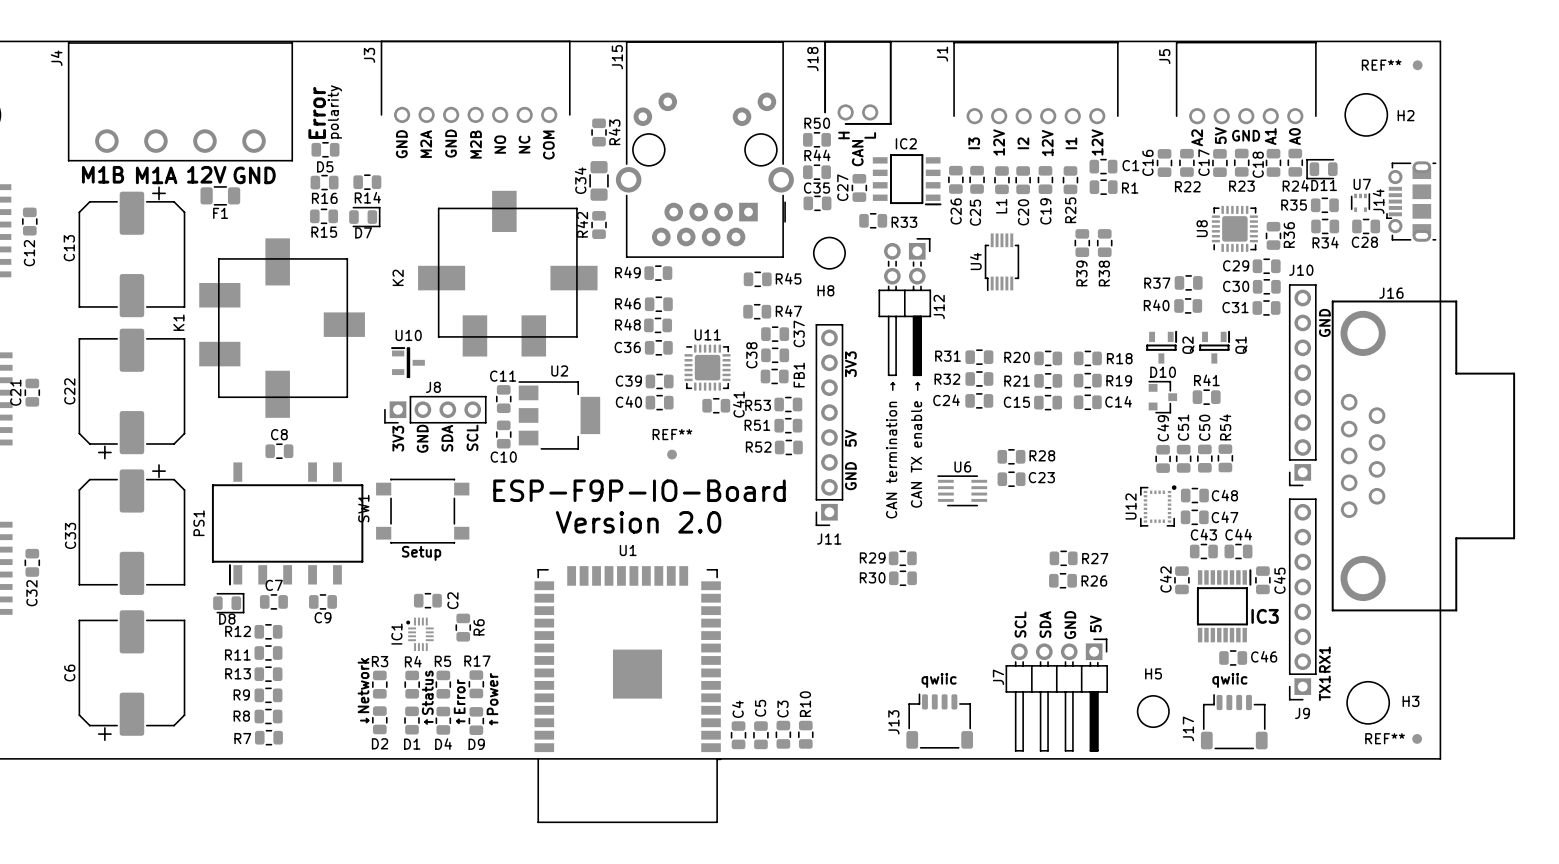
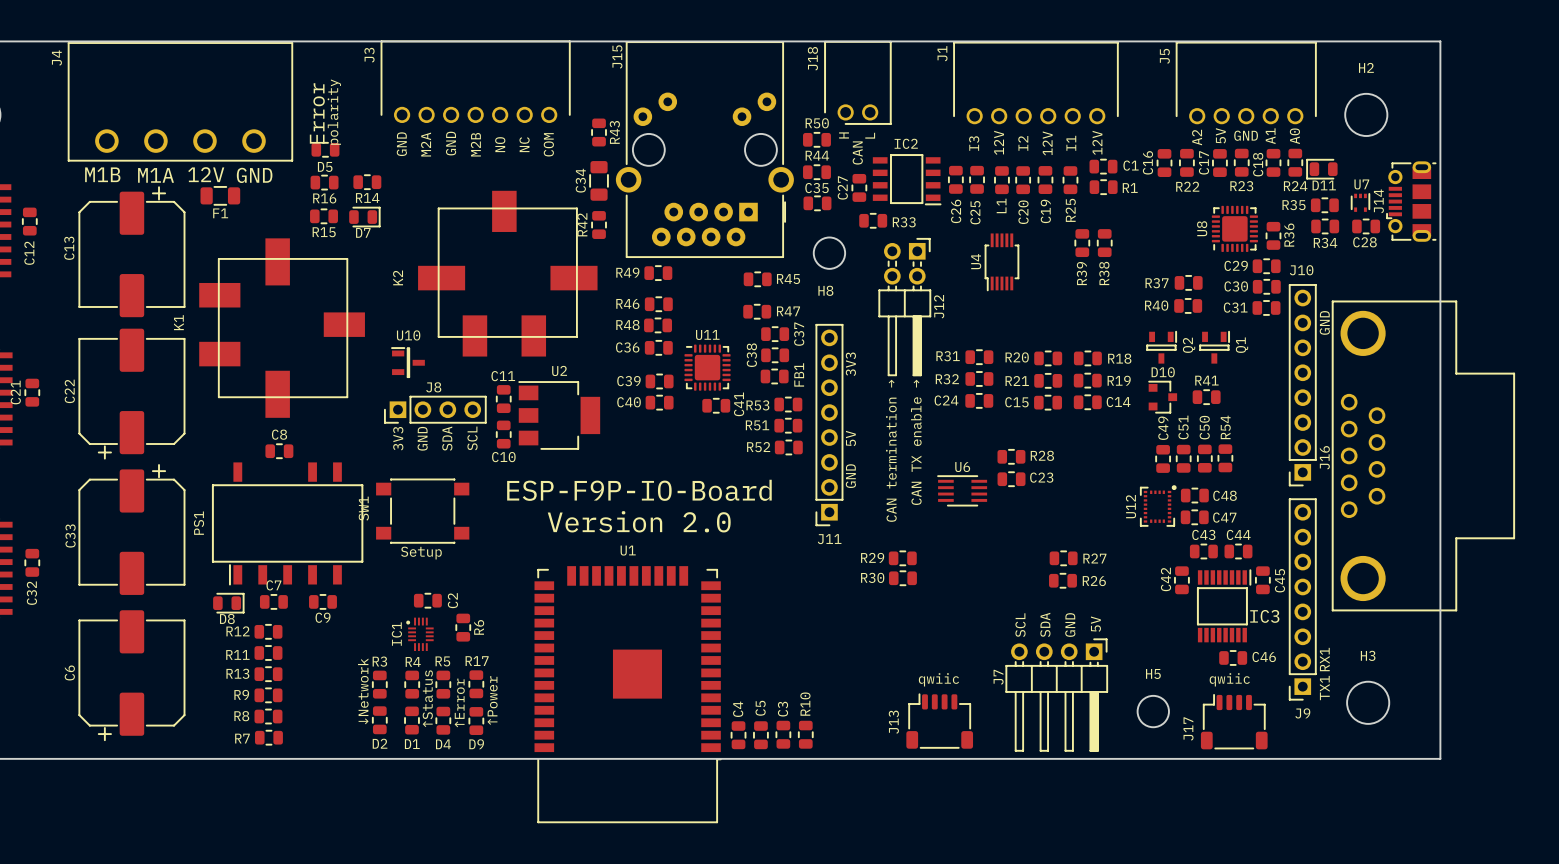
REF**: (1417, 65) -> none
H2 name position: H2 (1406, 115) -> H2 (1366, 67)
J16 name rotation: 0° (1391, 293) -> 90° counterclockwise (1324, 457)
J16 name position: J16 (1391, 293) -> J16 (1324, 457)
REF**: (672, 454) -> none
H3 name position: H3 (1411, 701) -> H3 (1368, 655)
REF**: (1417, 738) -> none

